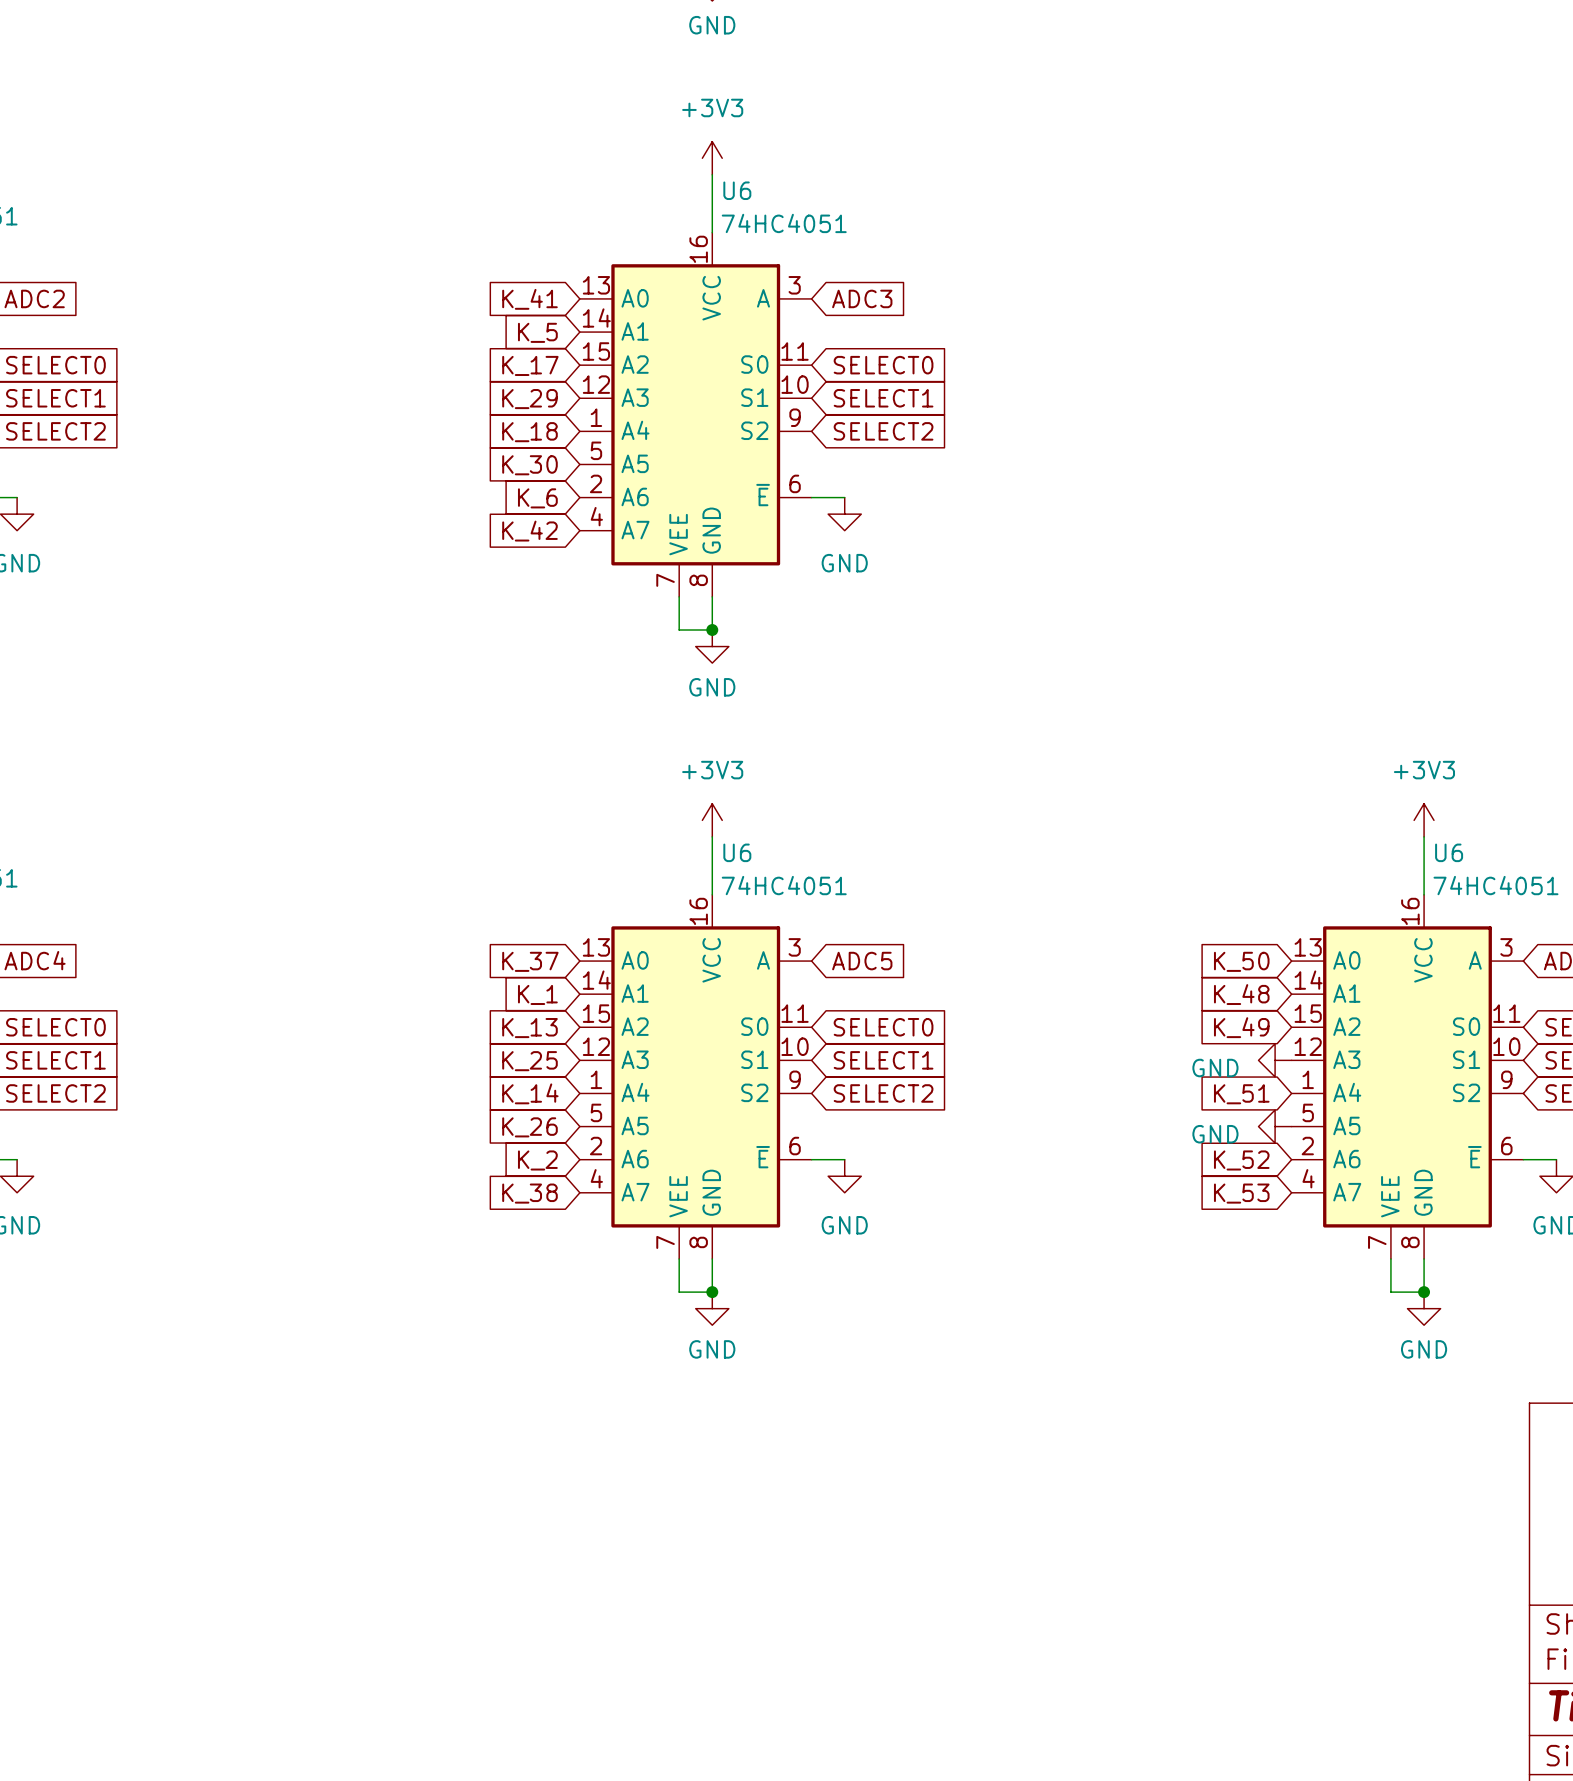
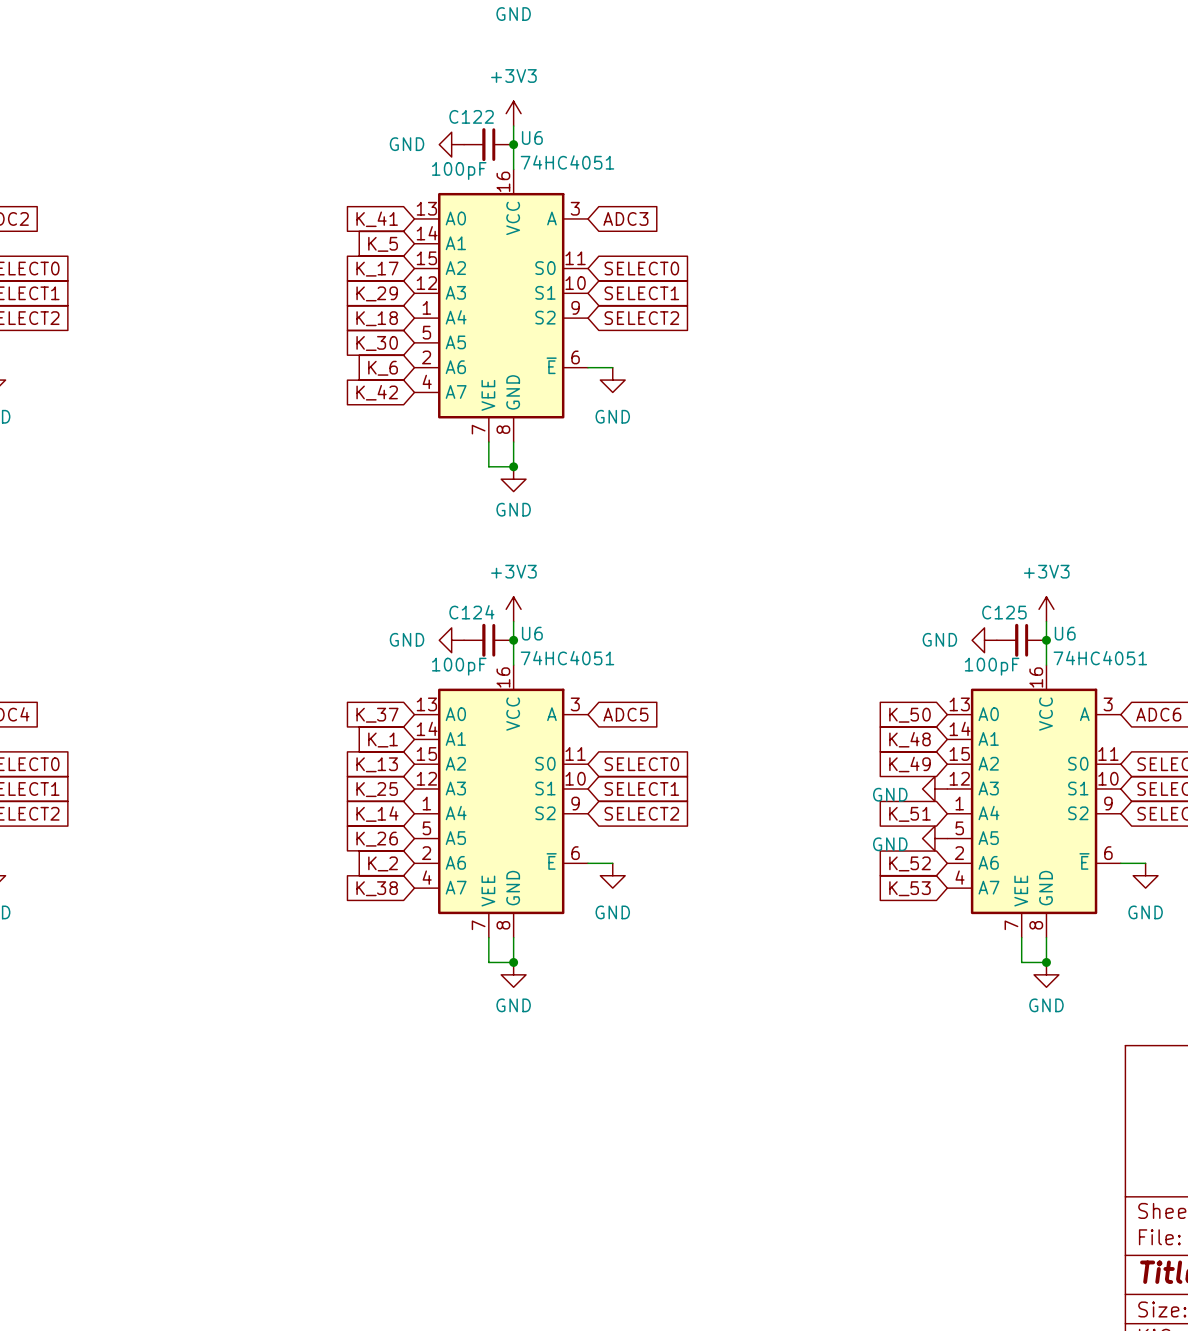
power symbol: none -> GND (451, 144)
C122: none -> 100pF (488, 144)
junction: none -> (513, 144)
power symbol: none -> GND (451, 640)
C124: none -> 100pF (488, 640)
junction: none -> (513, 640)
power symbol: none -> GND (984, 640)
C125: none -> 100pF (1021, 640)
junction: none -> (1046, 640)

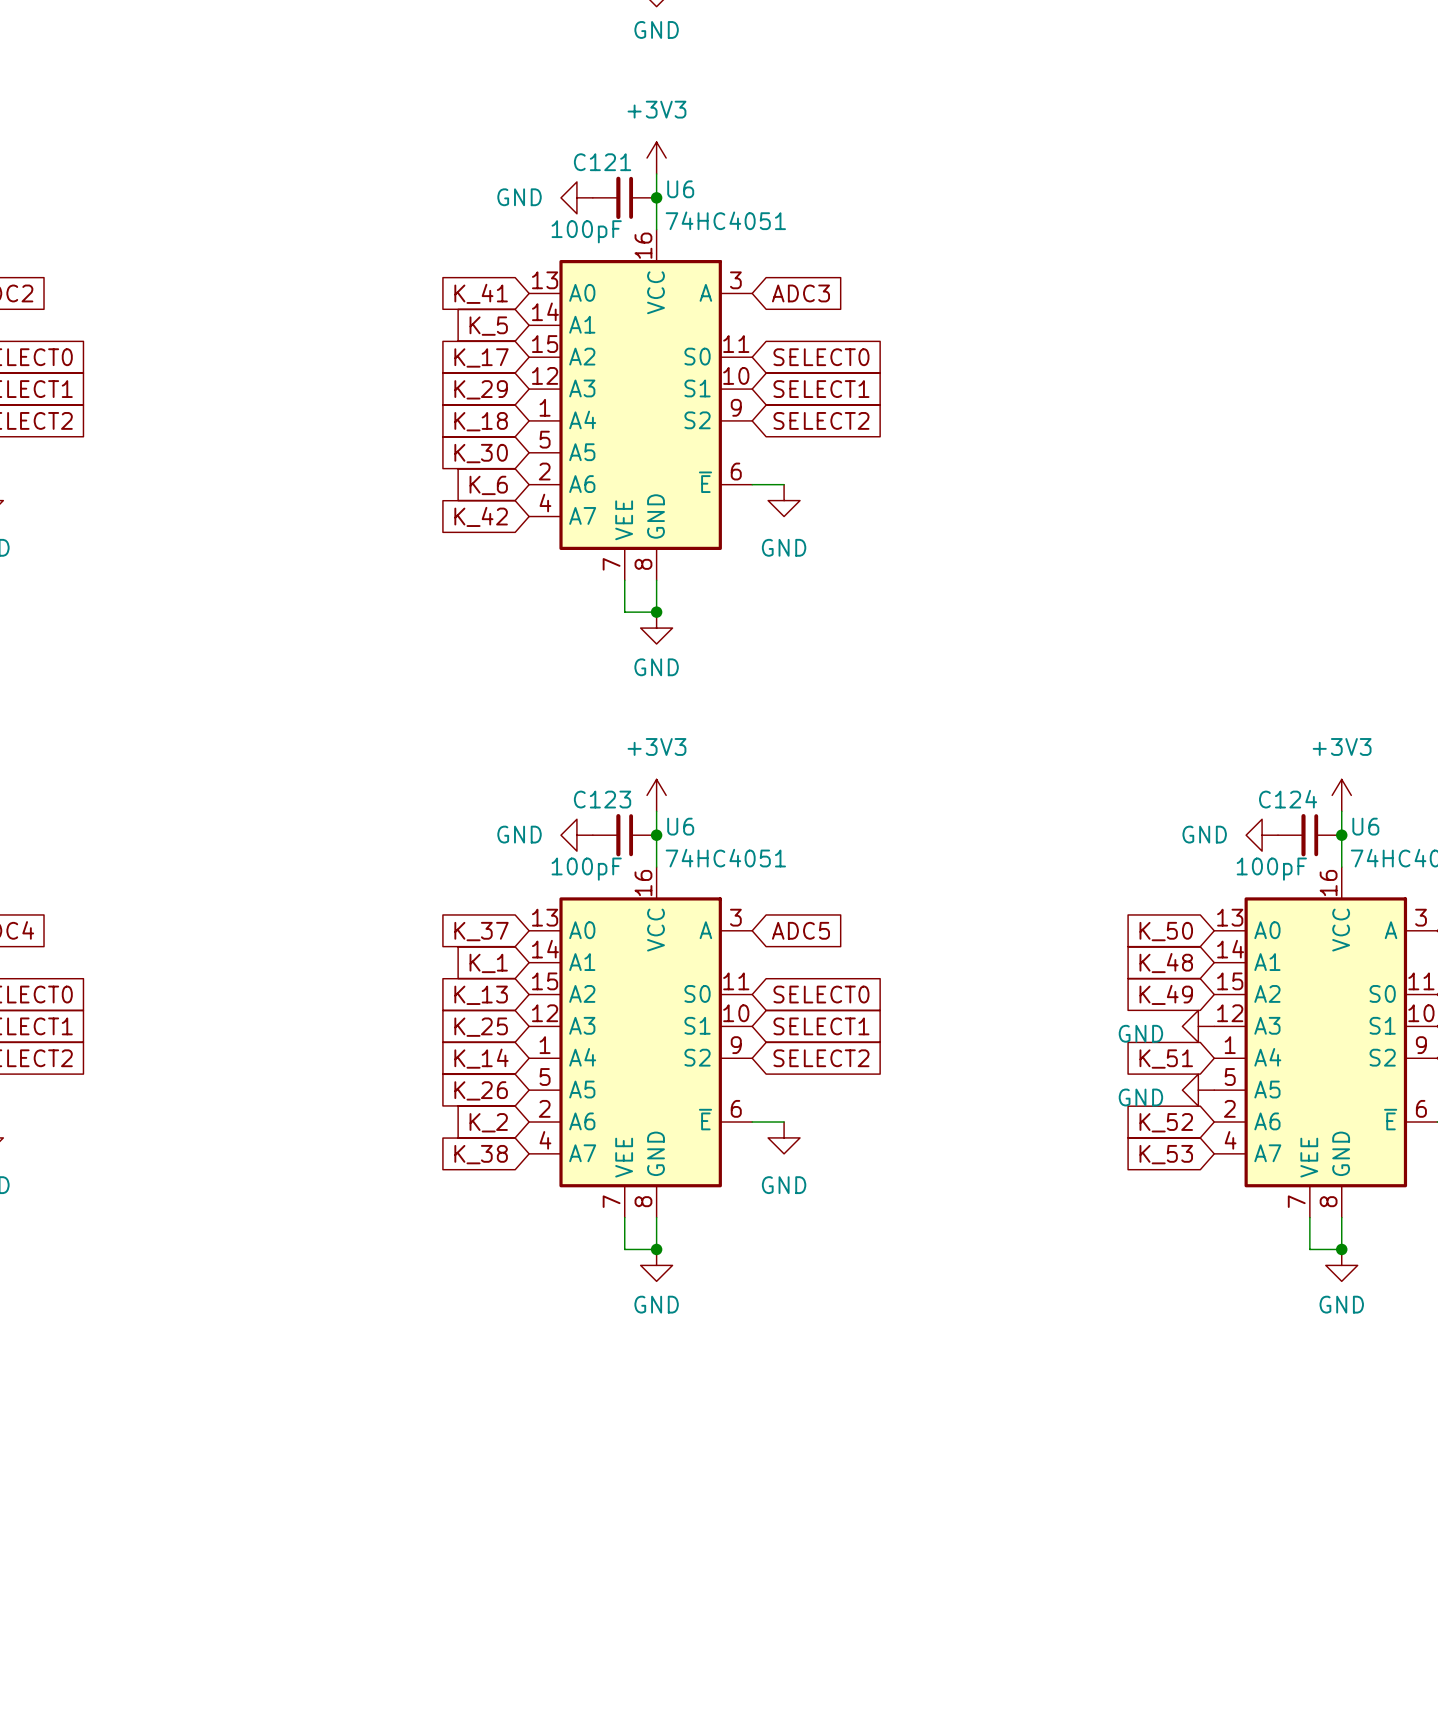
C122 name: C122 (471, 116) -> C121 (602, 162)
C124 name: C124 (471, 612) -> C123 (602, 799)
C125 name: C125 (1004, 612) -> C124 (1288, 799)

